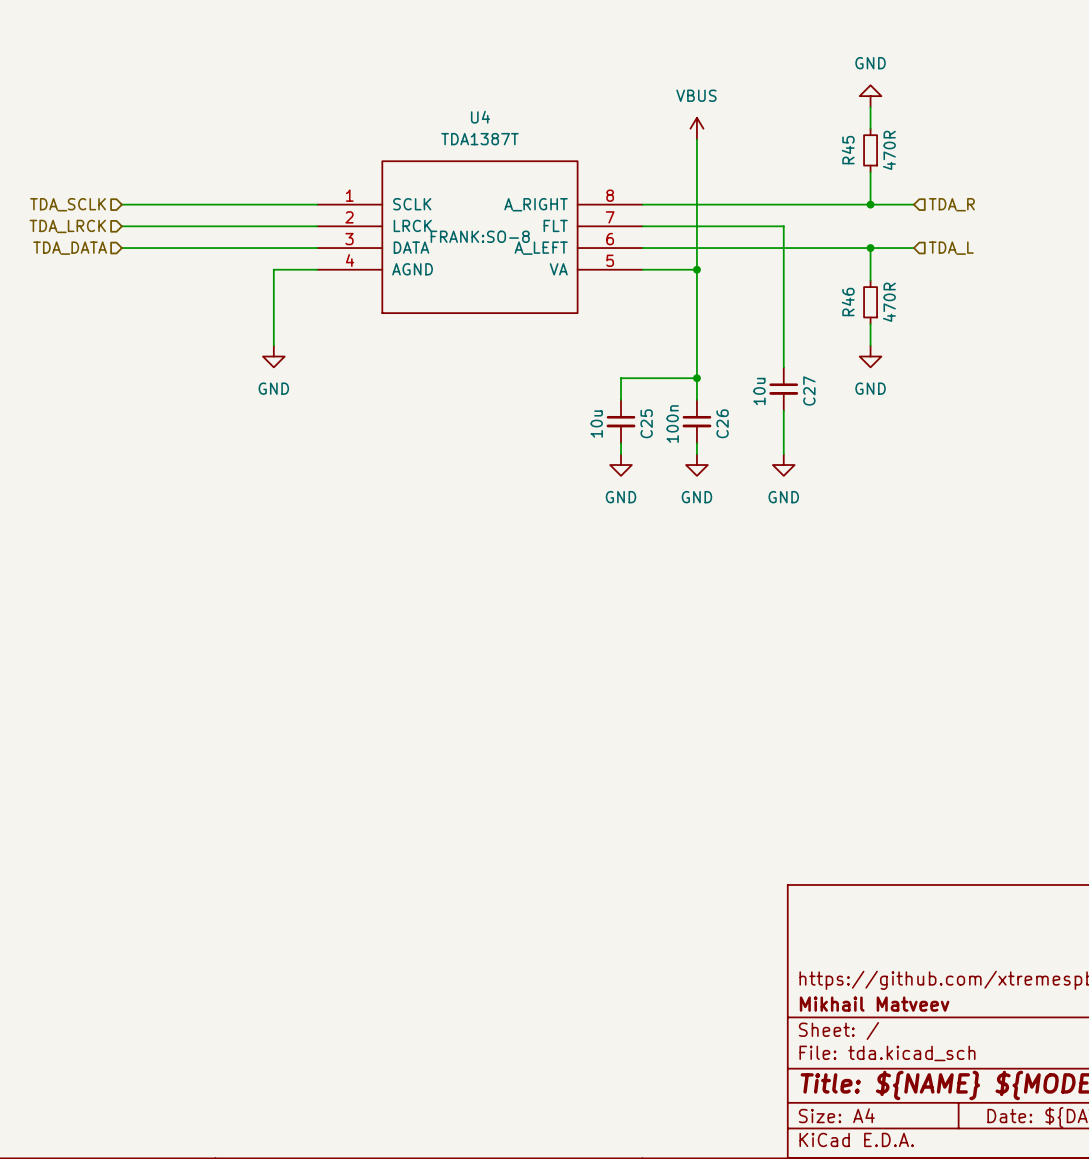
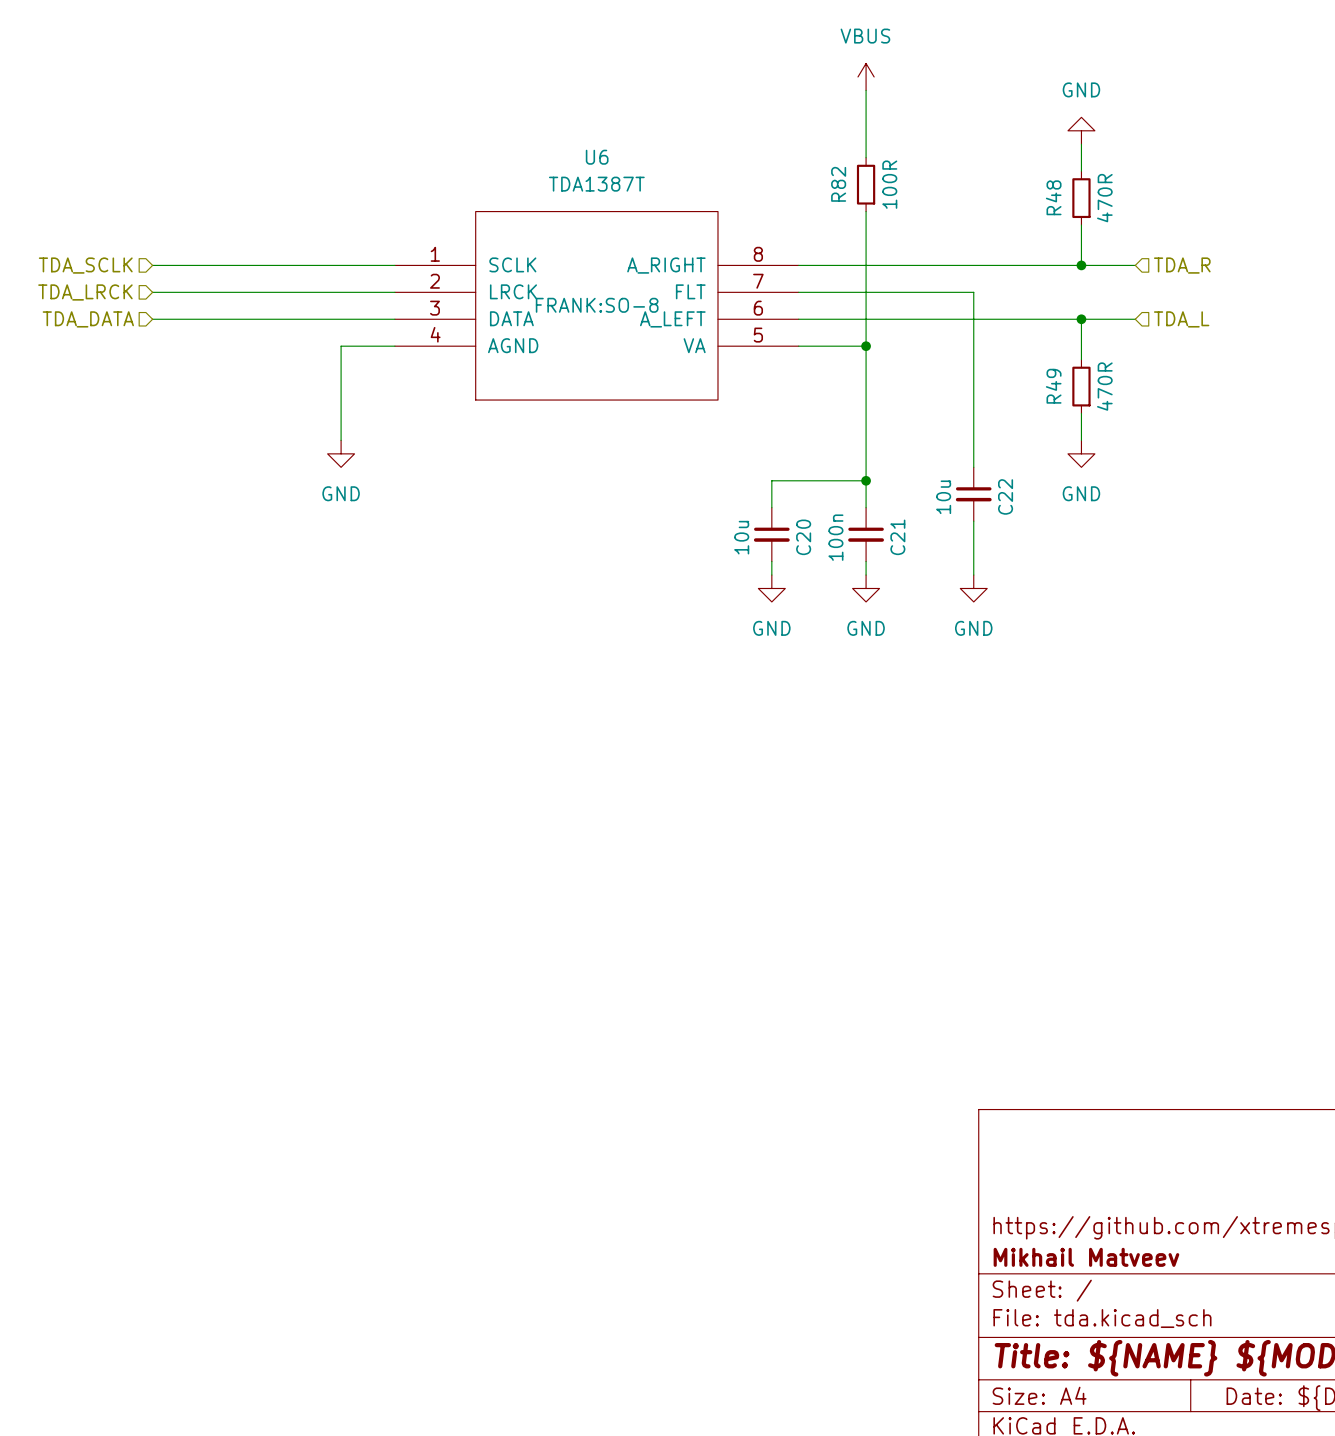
wire: none -> (866, 90) (866, 157)
U4 name: U4 (480, 117) -> U6 (597, 157)
power symbol position: VBUS (696, 128) -> VBUS (866, 76)
wire: (696, 139) (696, 161) -> none
R82: none -> 100R (866, 184)
R45 name: R45 (848, 150) -> R48 (1053, 197)
R46 name: R46 (848, 302) -> R49 (1053, 386)
C27 name: C27 (809, 390) -> C22 (1005, 496)
C25 name: C25 (646, 423) -> C20 (803, 537)
C26 name: C26 (722, 423) -> C21 (897, 537)

